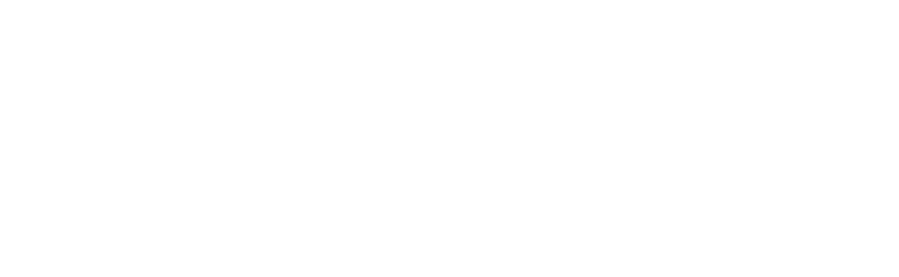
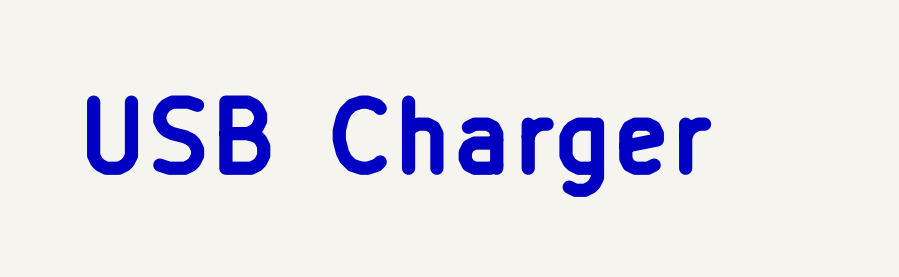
text: none -> USB Charger (399, 146)

